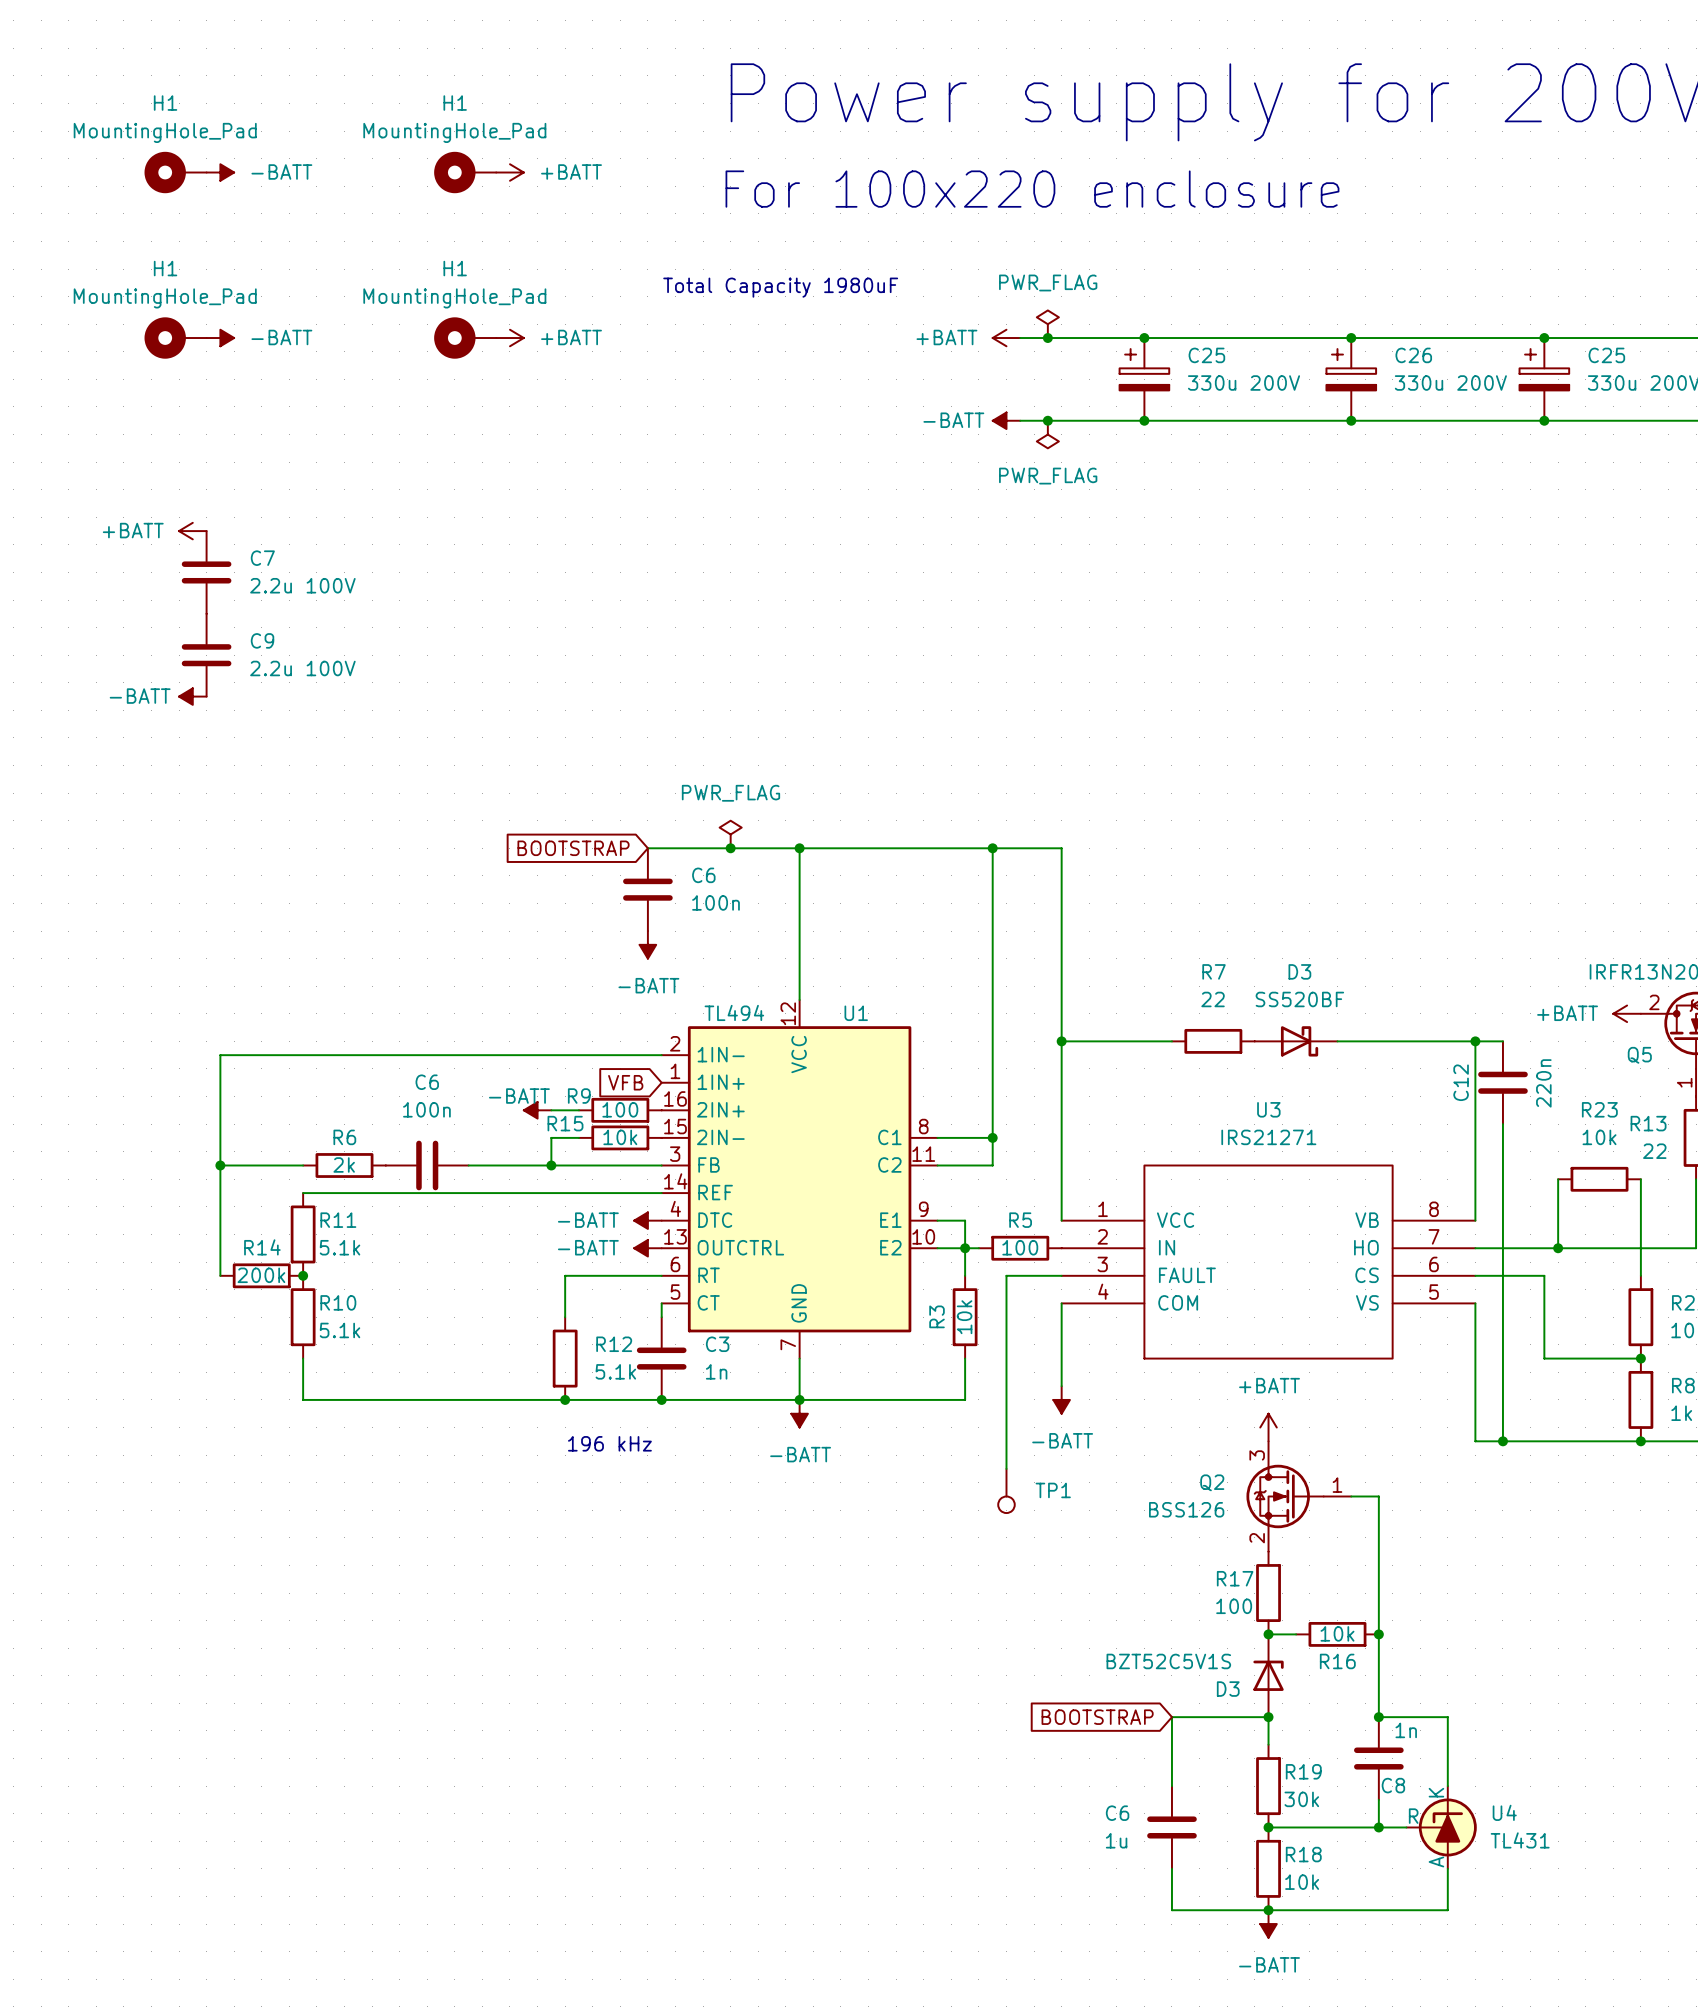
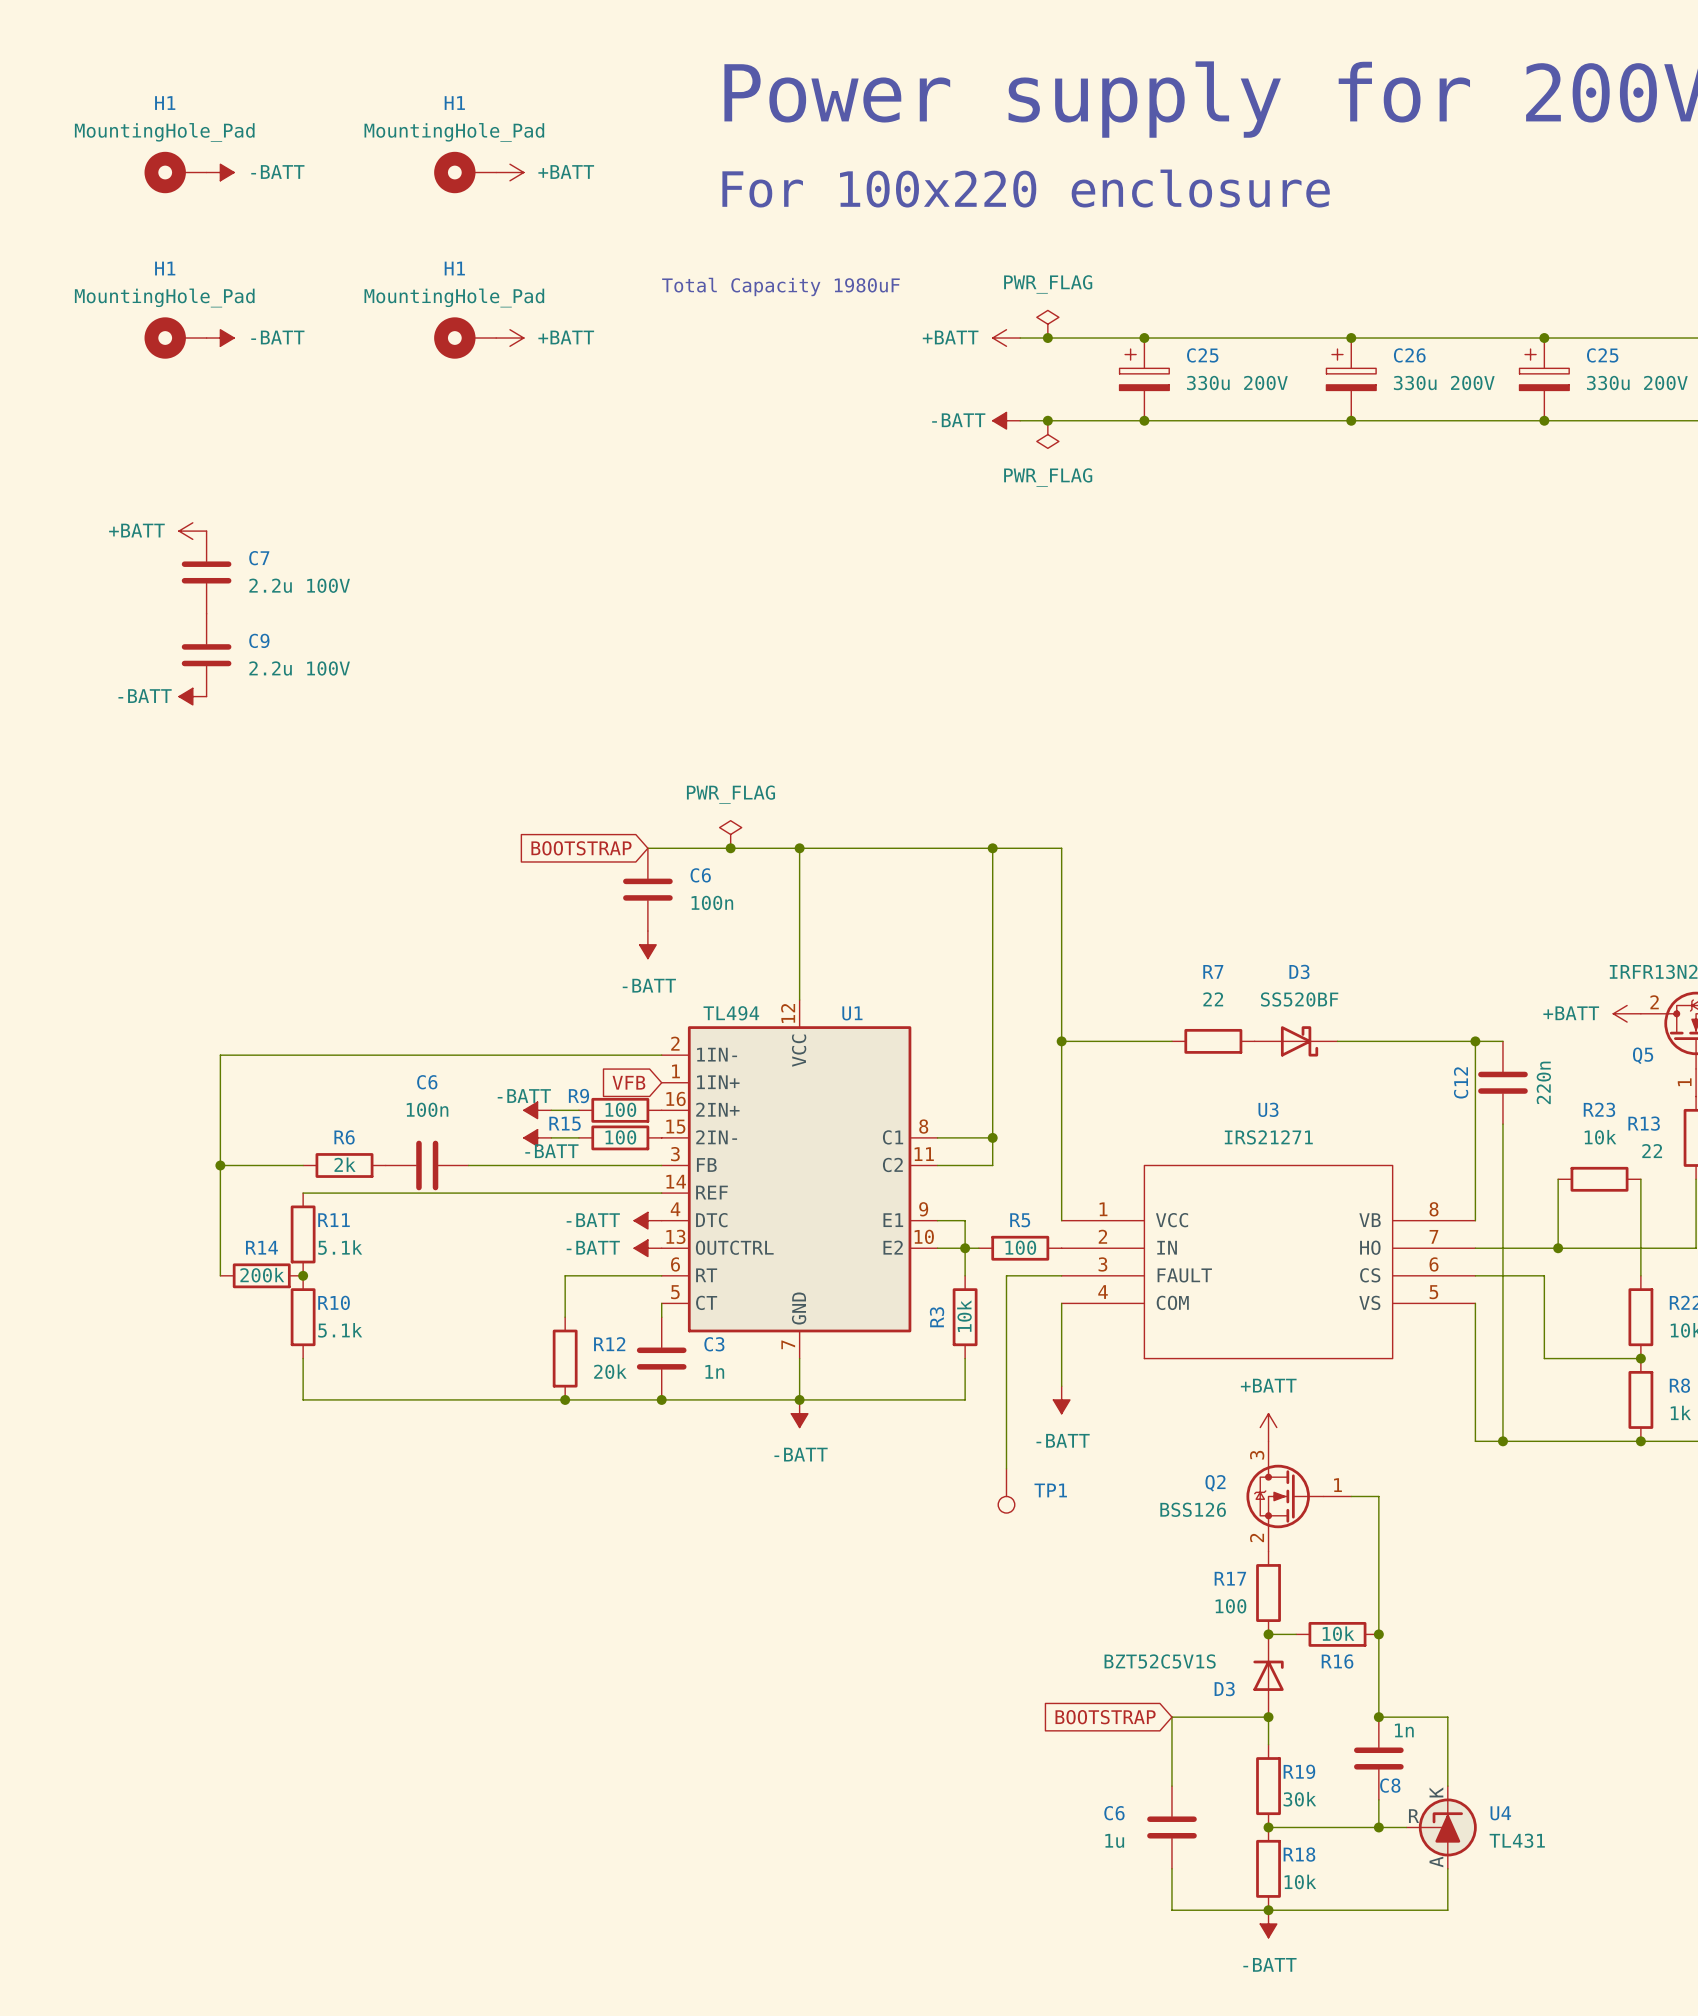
power symbol: none -> -BATT (537, 1137)
wire: (551, 1137) (551, 1165) -> none
R15 value: 10k (620, 1137) -> 100 (620, 1137)
junction: (551, 1165) -> none
R12 value: 5.1k (615, 1371) -> 20k (610, 1371)
text: 196 kHz (609, 1443) -> none

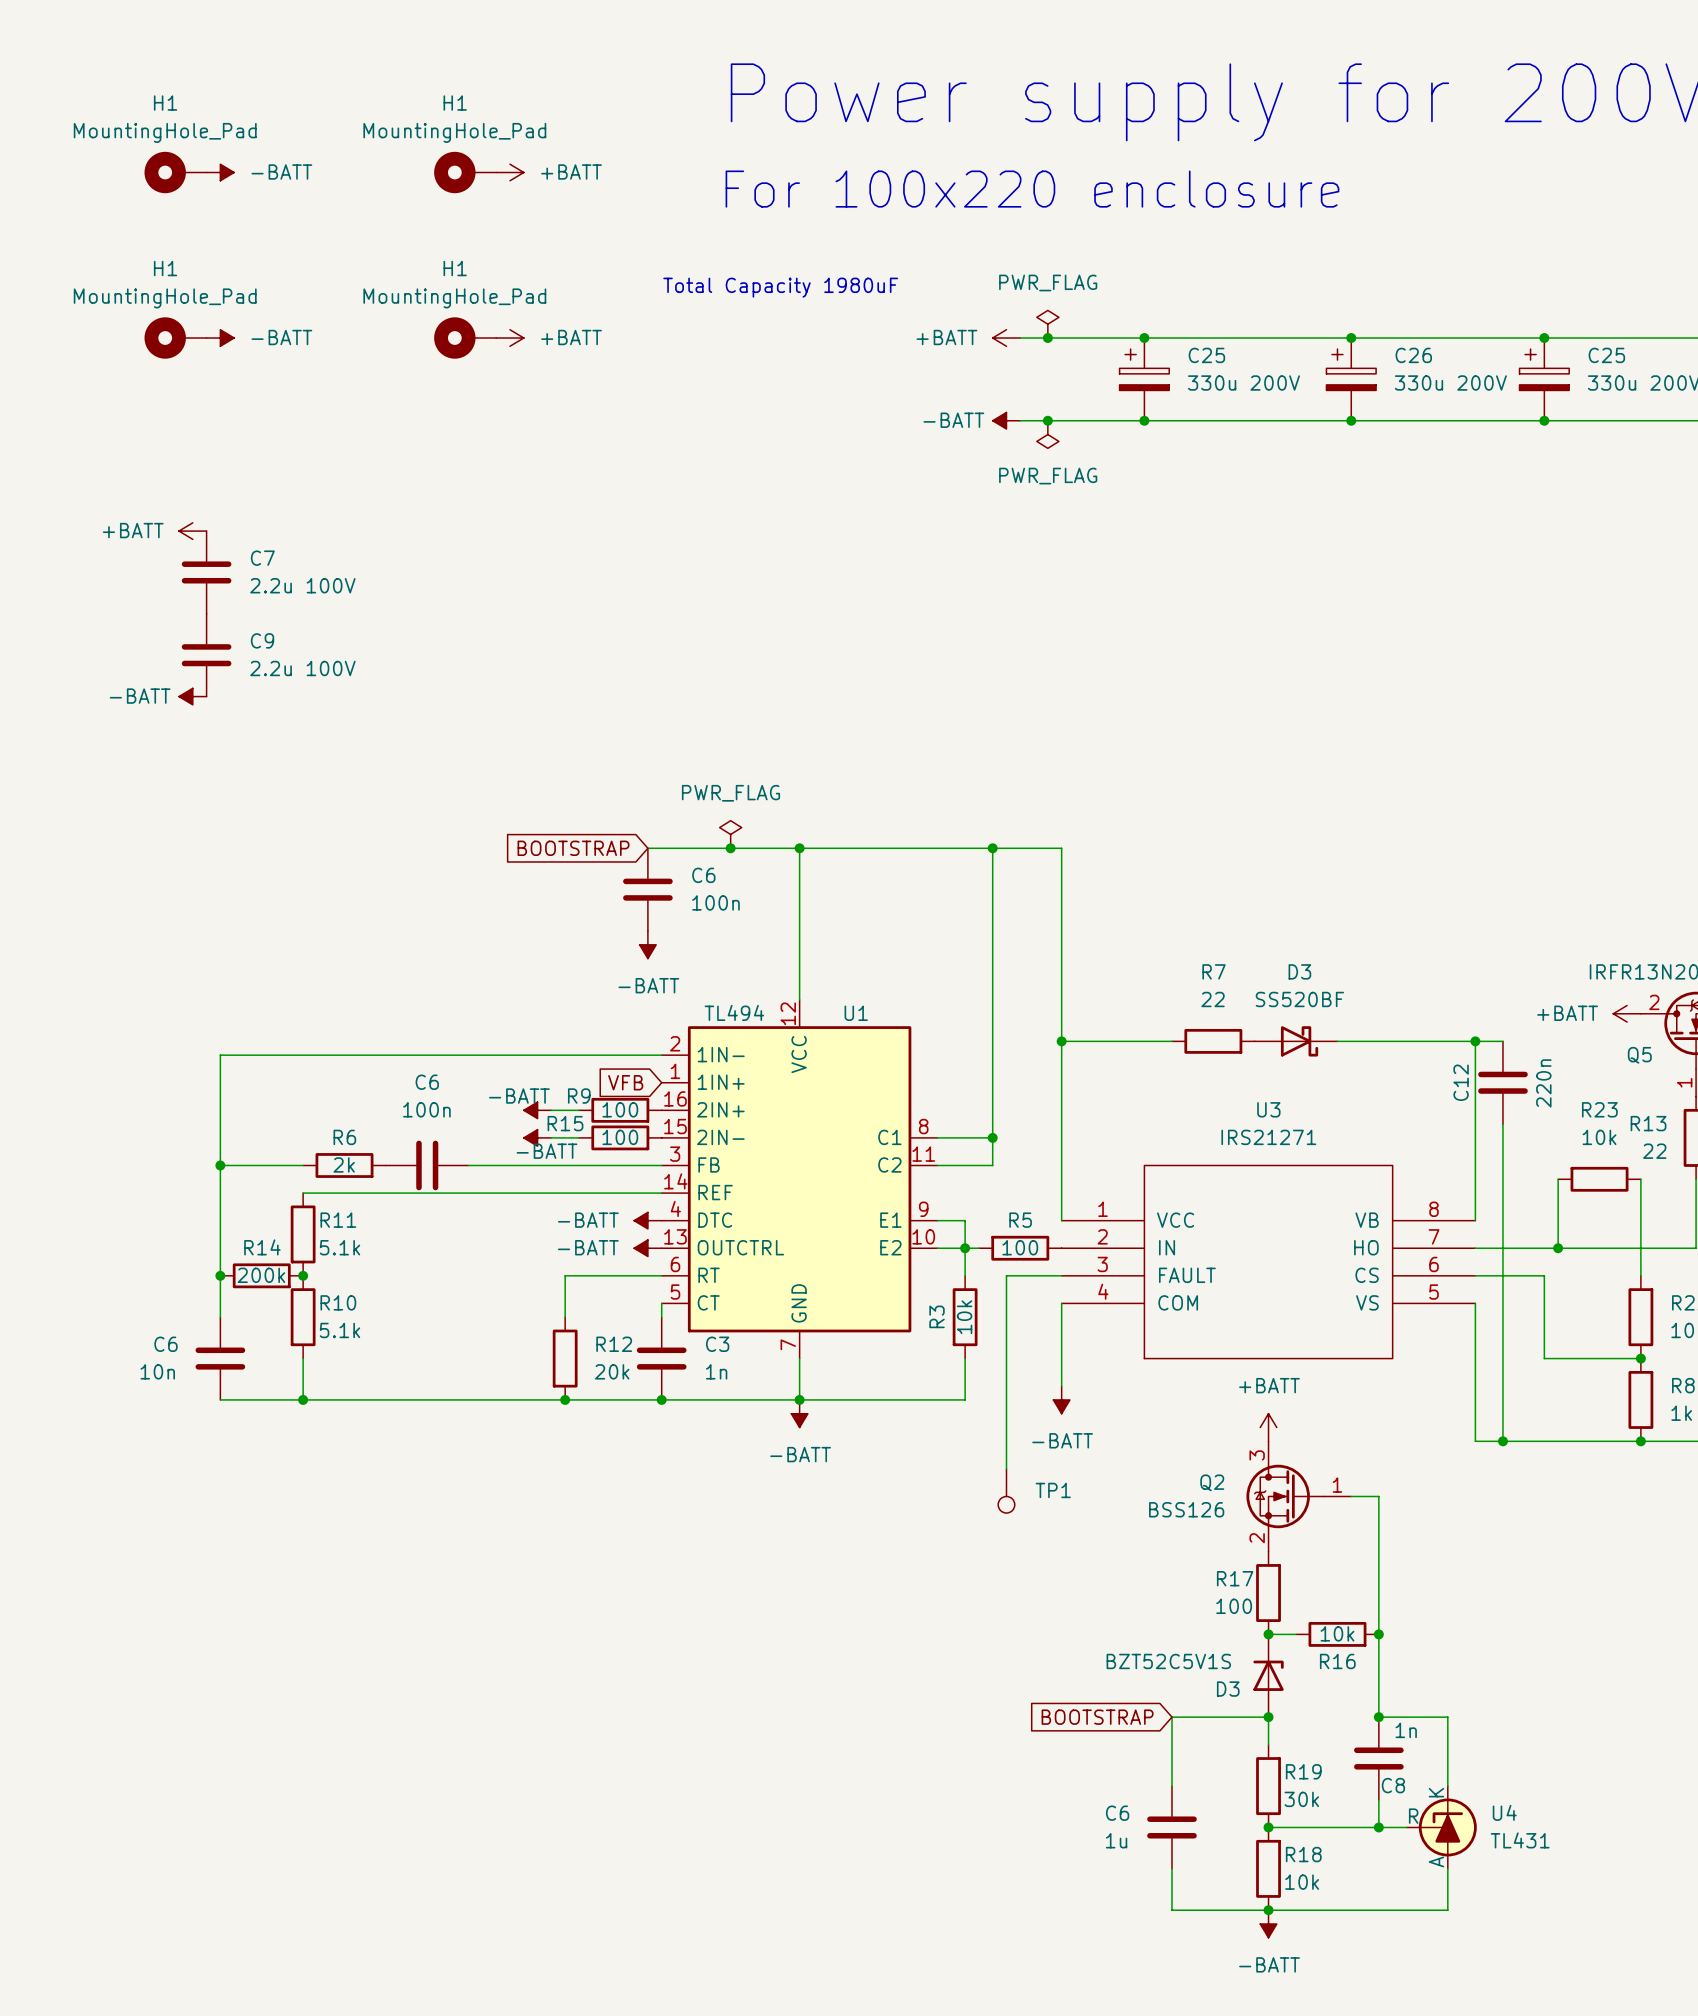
wire: none -> (220, 1275) (220, 1317)
junction: none -> (220, 1275)
C6: none -> 10n (220, 1358)
wire: none -> (220, 1399) (303, 1399)
junction: none -> (303, 1399)

